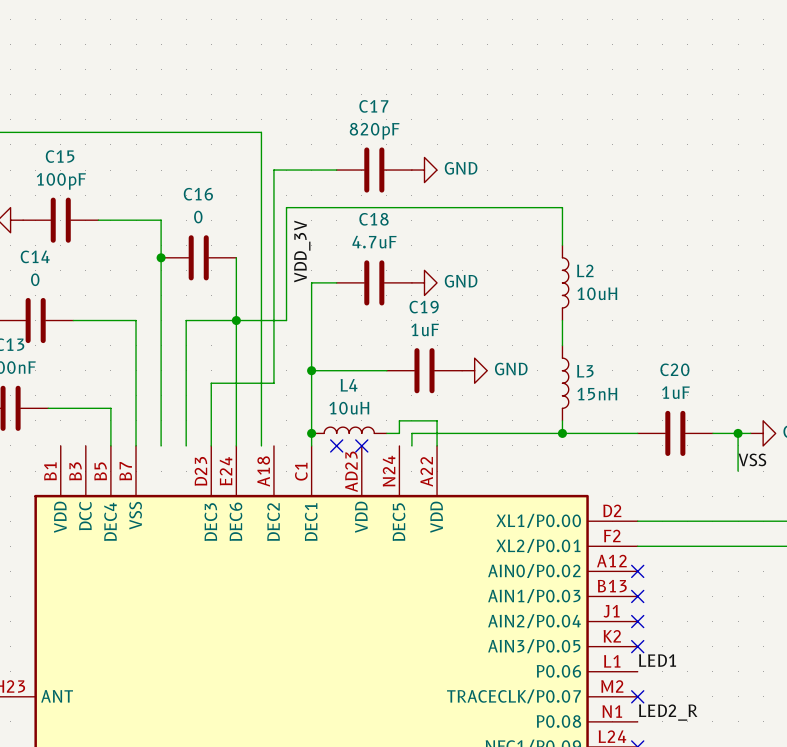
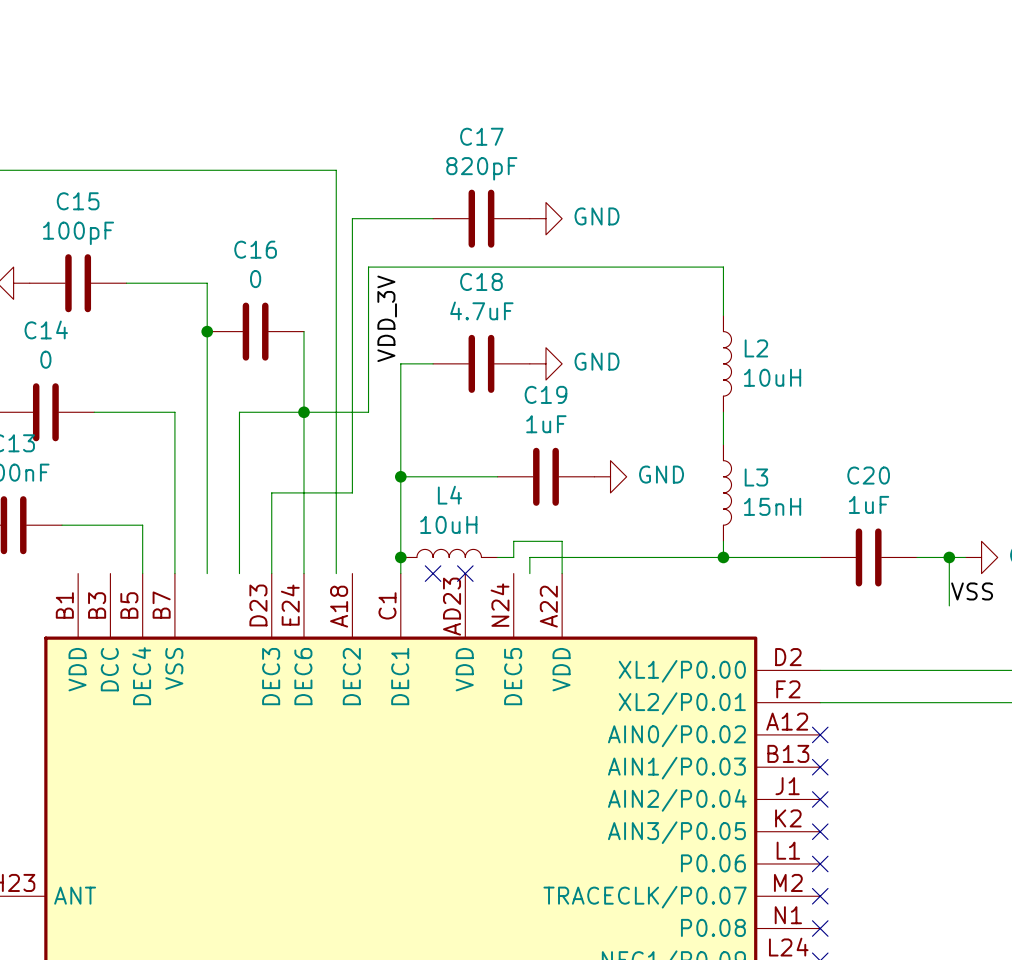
label: LED1 (657, 660) -> none
no-connect mark: none -> (820, 863)
label: LED2_R (668, 712) -> none
no-connect mark: none -> (820, 928)

